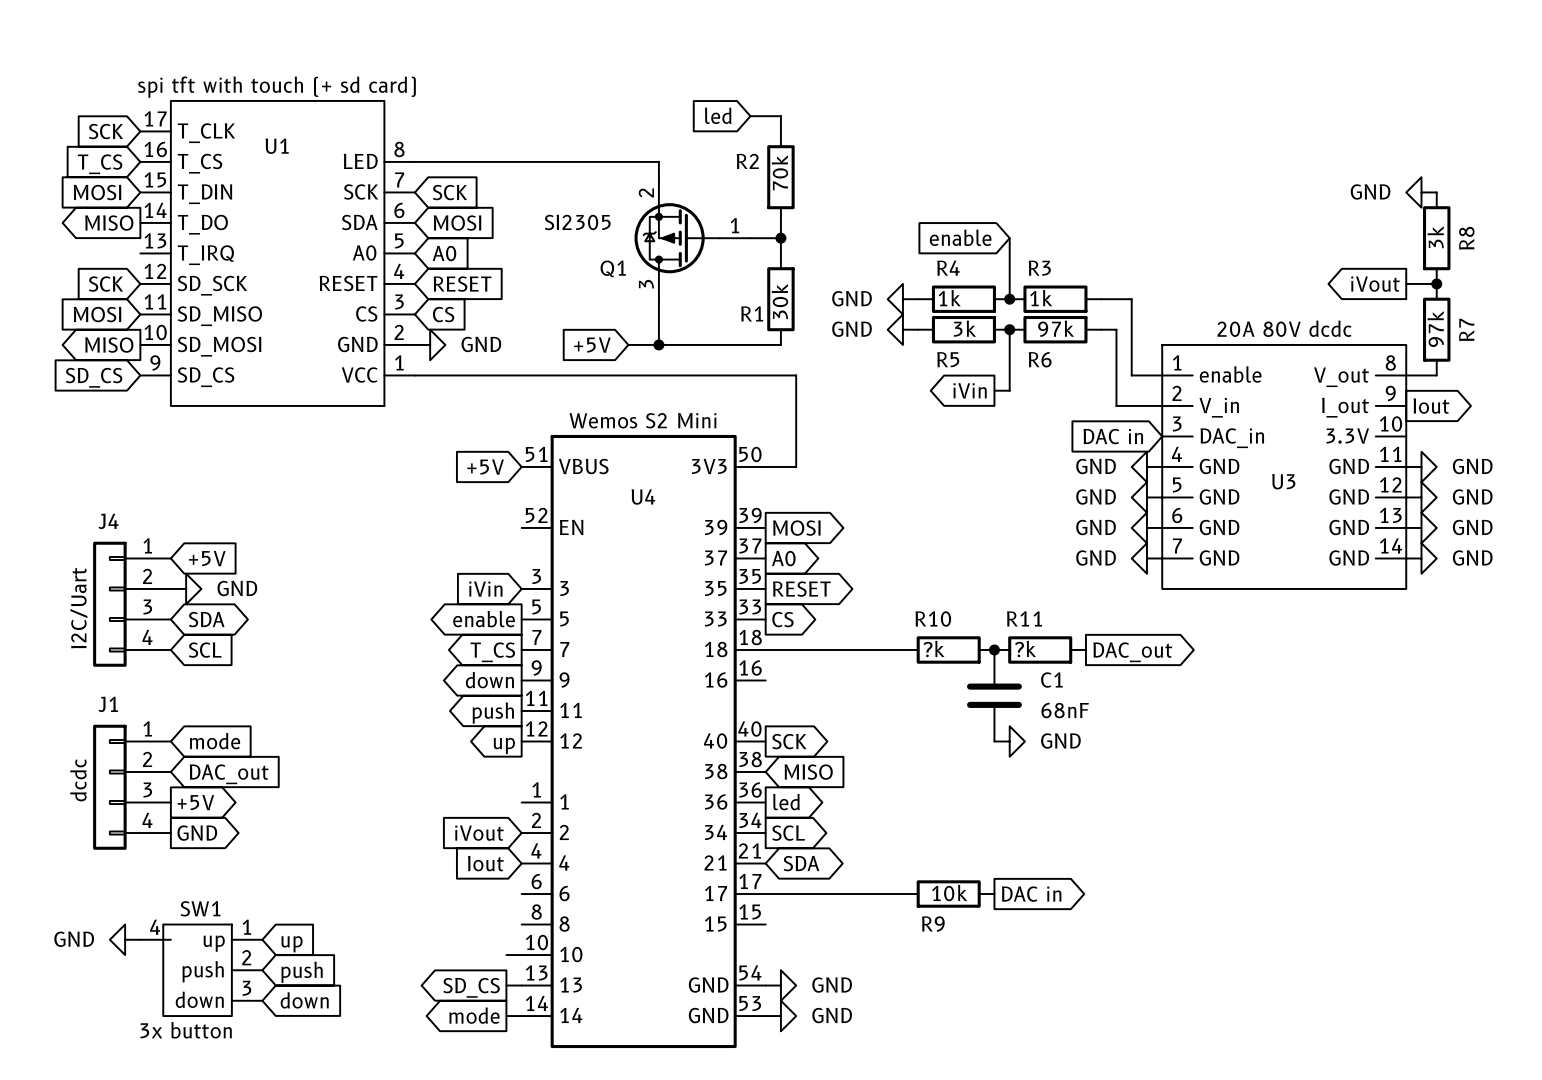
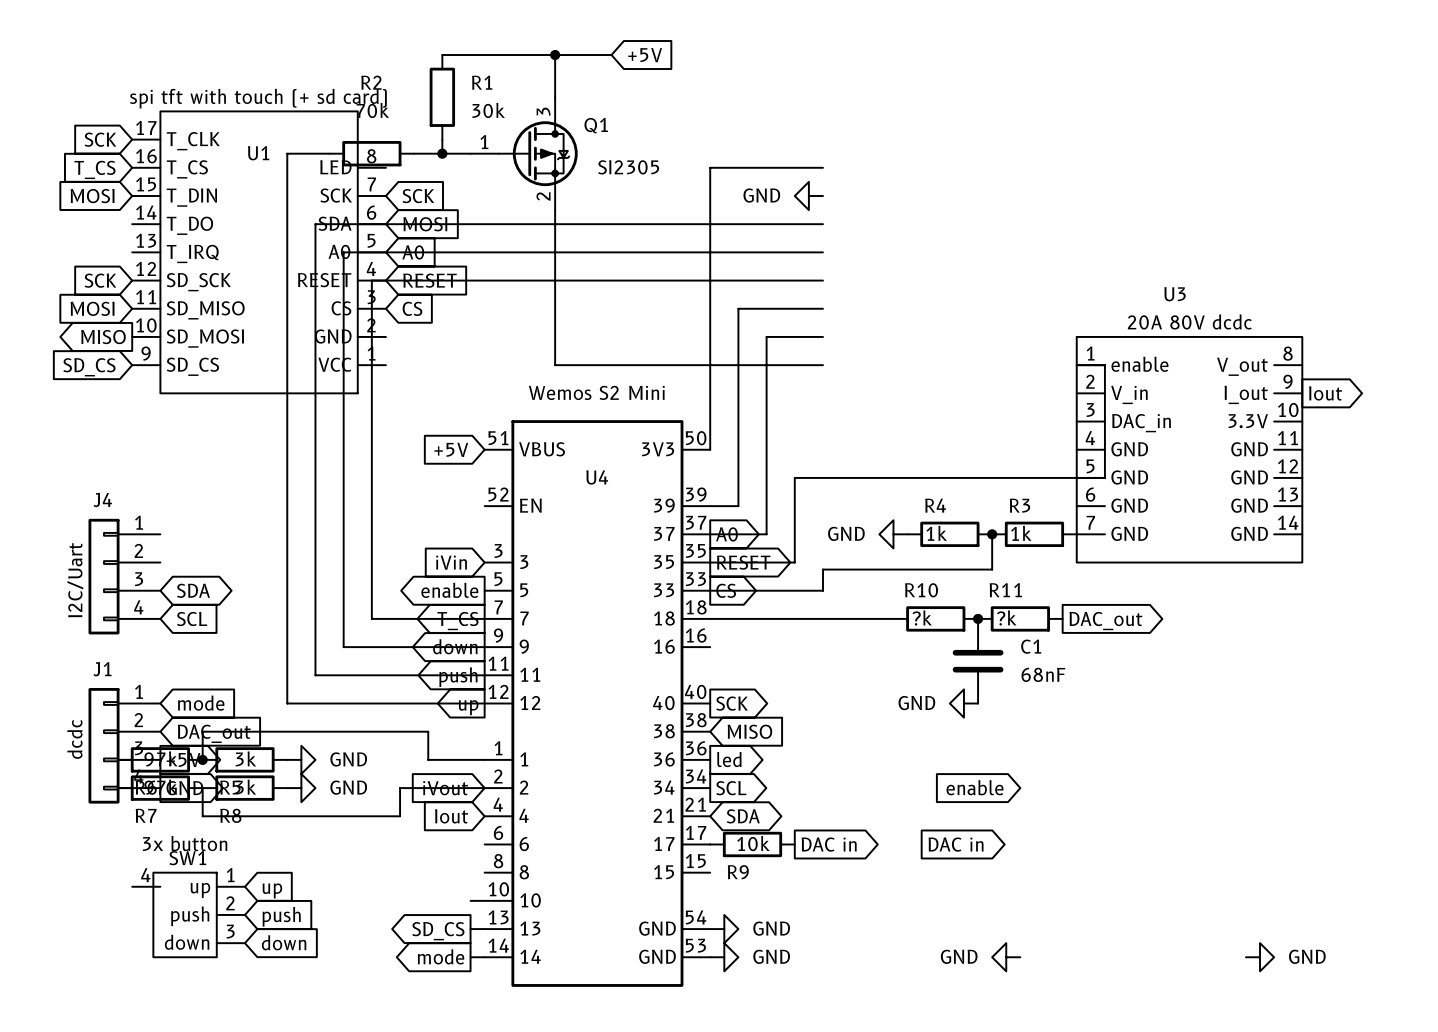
wire: none -> (442, 55) (611, 55)
junction: none -> (555, 55)
global label: none -> +5V (645, 55)
global label: led (718, 115) -> none
wire: (750, 116) (780, 116) (780, 131) -> none
wire: none -> (442, 139) (442, 153)
wire: none -> (329, 153) (287, 153) (287, 703) (484, 703)
wire: none -> (414, 153) (470, 153)
junction: none -> (442, 153)
wire: (414, 161) (658, 161) (658, 177) -> none
R2 name position: R2 (747, 161) -> R2 (371, 82)
wire: none -> (822, 167) (710, 167) (710, 449)
R2 value position: 70k (779, 172) -> 70k (372, 110)
R2 rotation: 0° (780, 177) -> 90° clockwise (371, 153)
R2 position: (780, 177) -> (371, 153)
power symbol: none -> GND (808, 195)
power symbol: GND (1421, 192) -> none
wire: (780, 222) (780, 253) -> none
wire: none -> (822, 224) (315, 224) (315, 675) (484, 675)
global label: MISO (109, 223) -> none
global label: enable (960, 237) -> none
Q1 rotation: 0° (677, 238) -> 180° (538, 153)
Q1 position: (692, 238) -> (524, 153)
wire: (750, 238) (780, 238) -> none
junction: (780, 238) -> none
wire: (1009, 238) (1009, 299) -> none
R8 rotation: 0° (1436, 238) -> 90° clockwise (244, 788)
R8 position: (1436, 238) -> (244, 788)
wire: none -> (822, 252) (343, 252) (343, 647) (484, 647)
wire: none -> (822, 280) (371, 280) (371, 618) (484, 618)
wire: (1406, 283) (1436, 283) -> none
junction: (1436, 283) -> none
global label: iVout (1375, 284) -> none
wire: (658, 299) (658, 344) -> (555, 55) (555, 97)
R1 position: (780, 299) -> (442, 97)
power symbol: GND (902, 299) -> none
R4 position: (963, 299) -> (949, 534)
junction: (1009, 299) -> none
R3 position: (1055, 299) -> (1034, 534)
wire: (1101, 299) (1131, 299) (1131, 375) (1162, 375) -> (710, 562) (794, 562) (794, 477) (1104, 477) (1104, 365) (1076, 365)
R1 value rotation: 0° (779, 301) -> 90° clockwise (488, 110)
R1 value position: 30k (779, 301) -> 30k (488, 110)
R1 name position: R1 (752, 313) -> R1 (482, 82)
wire: none -> (822, 308) (738, 308) (738, 365) (822, 365)
power symbol: GND (902, 329) -> none
R5 position: (963, 329) -> (244, 759)
wire: (1009, 329) (1009, 390) (994, 390) -> none
junction: (1009, 329) -> none
R6 position: (1055, 329) -> (160, 759)
wire: (1101, 329) (1116, 329) (1116, 405) (1162, 405) -> none
R7 rotation: 0° (1436, 329) -> 90° clockwise (160, 788)
R7 position: (1436, 329) -> (160, 788)
power symbol: GND (430, 344) -> none
wire: (628, 344) (780, 344) -> none
junction: (658, 344) -> none
wire: none -> (822, 336) (766, 336) (766, 534) (710, 534)
global label: +5V (592, 345) -> none
wire: (414, 375) (597, 375) -> (555, 210) (555, 365)
wire: (1406, 375) (1436, 375) -> none
global label: iVin (970, 390) -> none
U4 value position: Wemos S2 Mini (642, 420) -> Wemos S2 Mini (596, 392)
global label: DAC in (1113, 436) -> none
wire: (765, 466) (796, 466) -> (710, 506) (738, 506) (738, 449)
power symbol: GND (1146, 466) -> none
power symbol: GND (1421, 466) -> none
U3 name position: U3 (1283, 481) -> U3 (1175, 294)
power symbol: GND (1146, 497) -> none
power symbol: GND (1421, 497) -> none
power symbol: GND (1146, 527) -> none
power symbol: GND (1421, 527) -> none
global label: MOSI (796, 528) -> none
global label: +5V (207, 558) -> none
power symbol: none -> GND (893, 534)
wire: none -> (992, 534) (992, 569) (822, 569) (822, 590) (710, 590)
junction: none -> (992, 534)
power symbol: GND (1146, 558) -> none
power symbol: GND (1421, 558) -> none
power symbol: GND (186, 588) -> none
wire: none -> (837, 618) (893, 618)
R10 position: (948, 649) -> (935, 618)
junction: (994, 649) -> none
R11 position: (1040, 649) -> (1020, 618)
junction: none -> (978, 618)
global label position: DAC_out (1132, 652) -> DAC_out (1105, 621)
C1 position: (994, 695) -> (978, 661)
power symbol rotation: 0° (1009, 741) -> 180° (963, 703)
power symbol position: GND (1009, 741) -> GND (963, 703)
wire: none -> (202, 759) (202, 731) (428, 731) (428, 759) (484, 759)
junction: none -> (202, 759)
power symbol: none -> GND (301, 759)
global label: none -> enable (975, 787)
wire: none -> (202, 788) (202, 816) (400, 816) (400, 788) (484, 788)
power symbol: none -> GND (301, 788)
wire: (765, 894) (902, 894) -> none
global label: none -> DAC in (829, 844)
R9 position: (948, 894) -> (752, 844)
power symbol: GND (125, 939) -> none
power symbol: none -> GND (1006, 957)
power symbol: none -> GND (1260, 957)
SW1 value position: 3x button (186, 1030) -> 3x button (185, 843)

